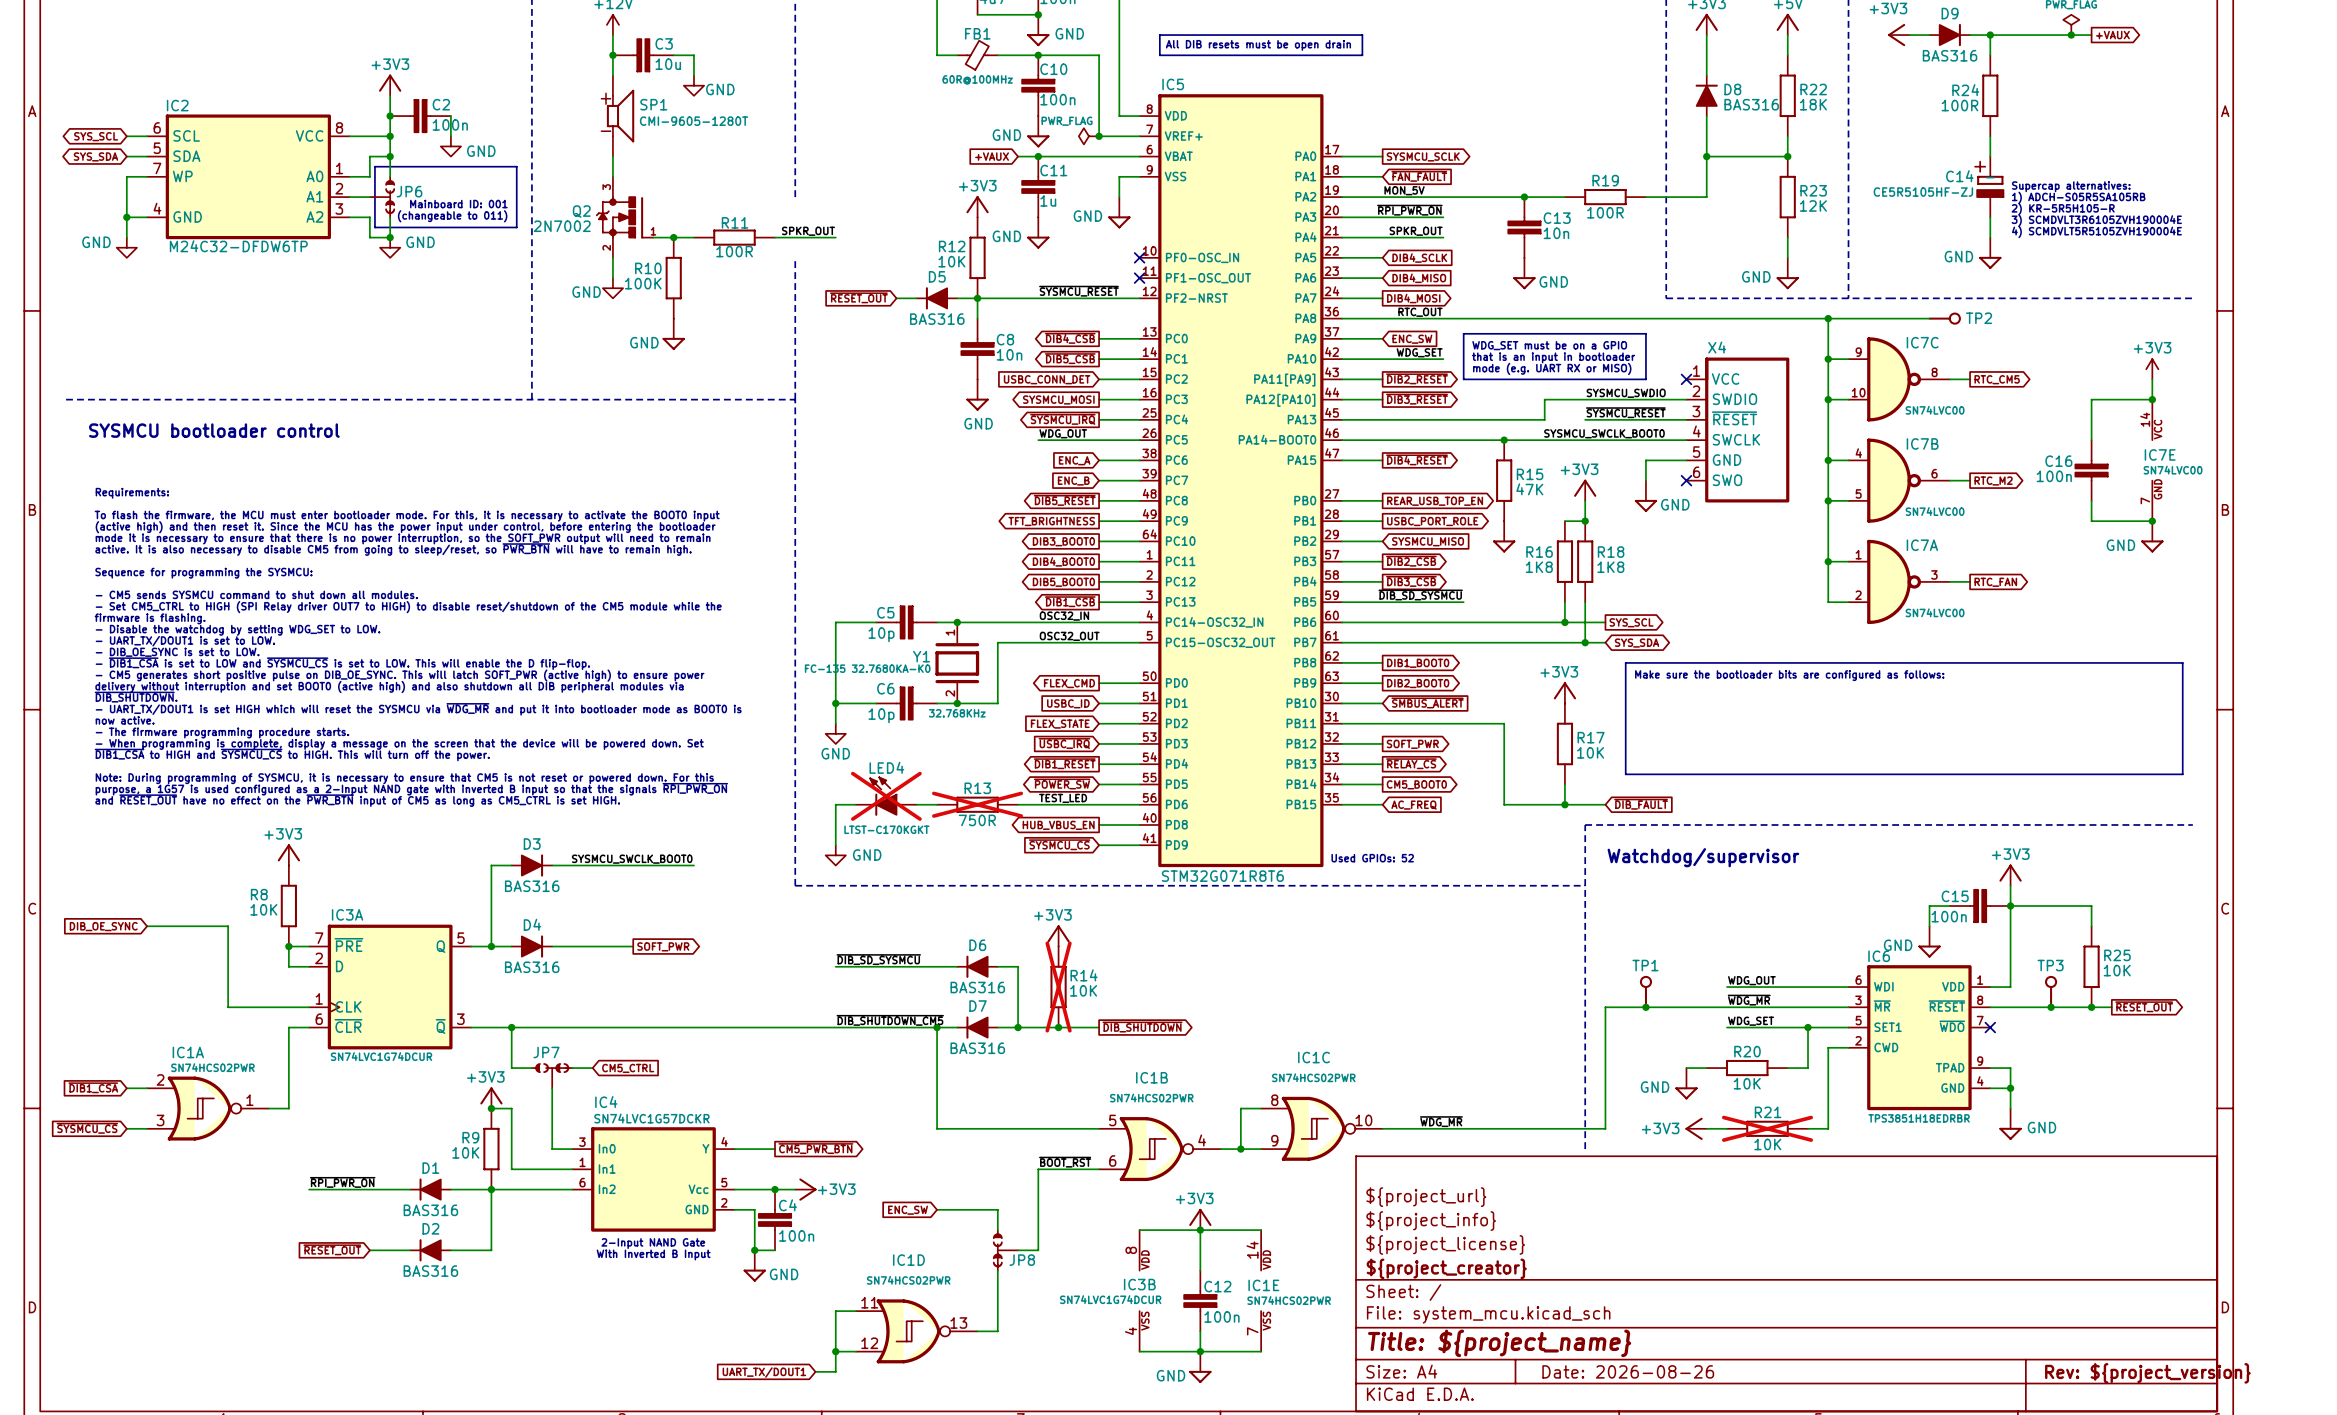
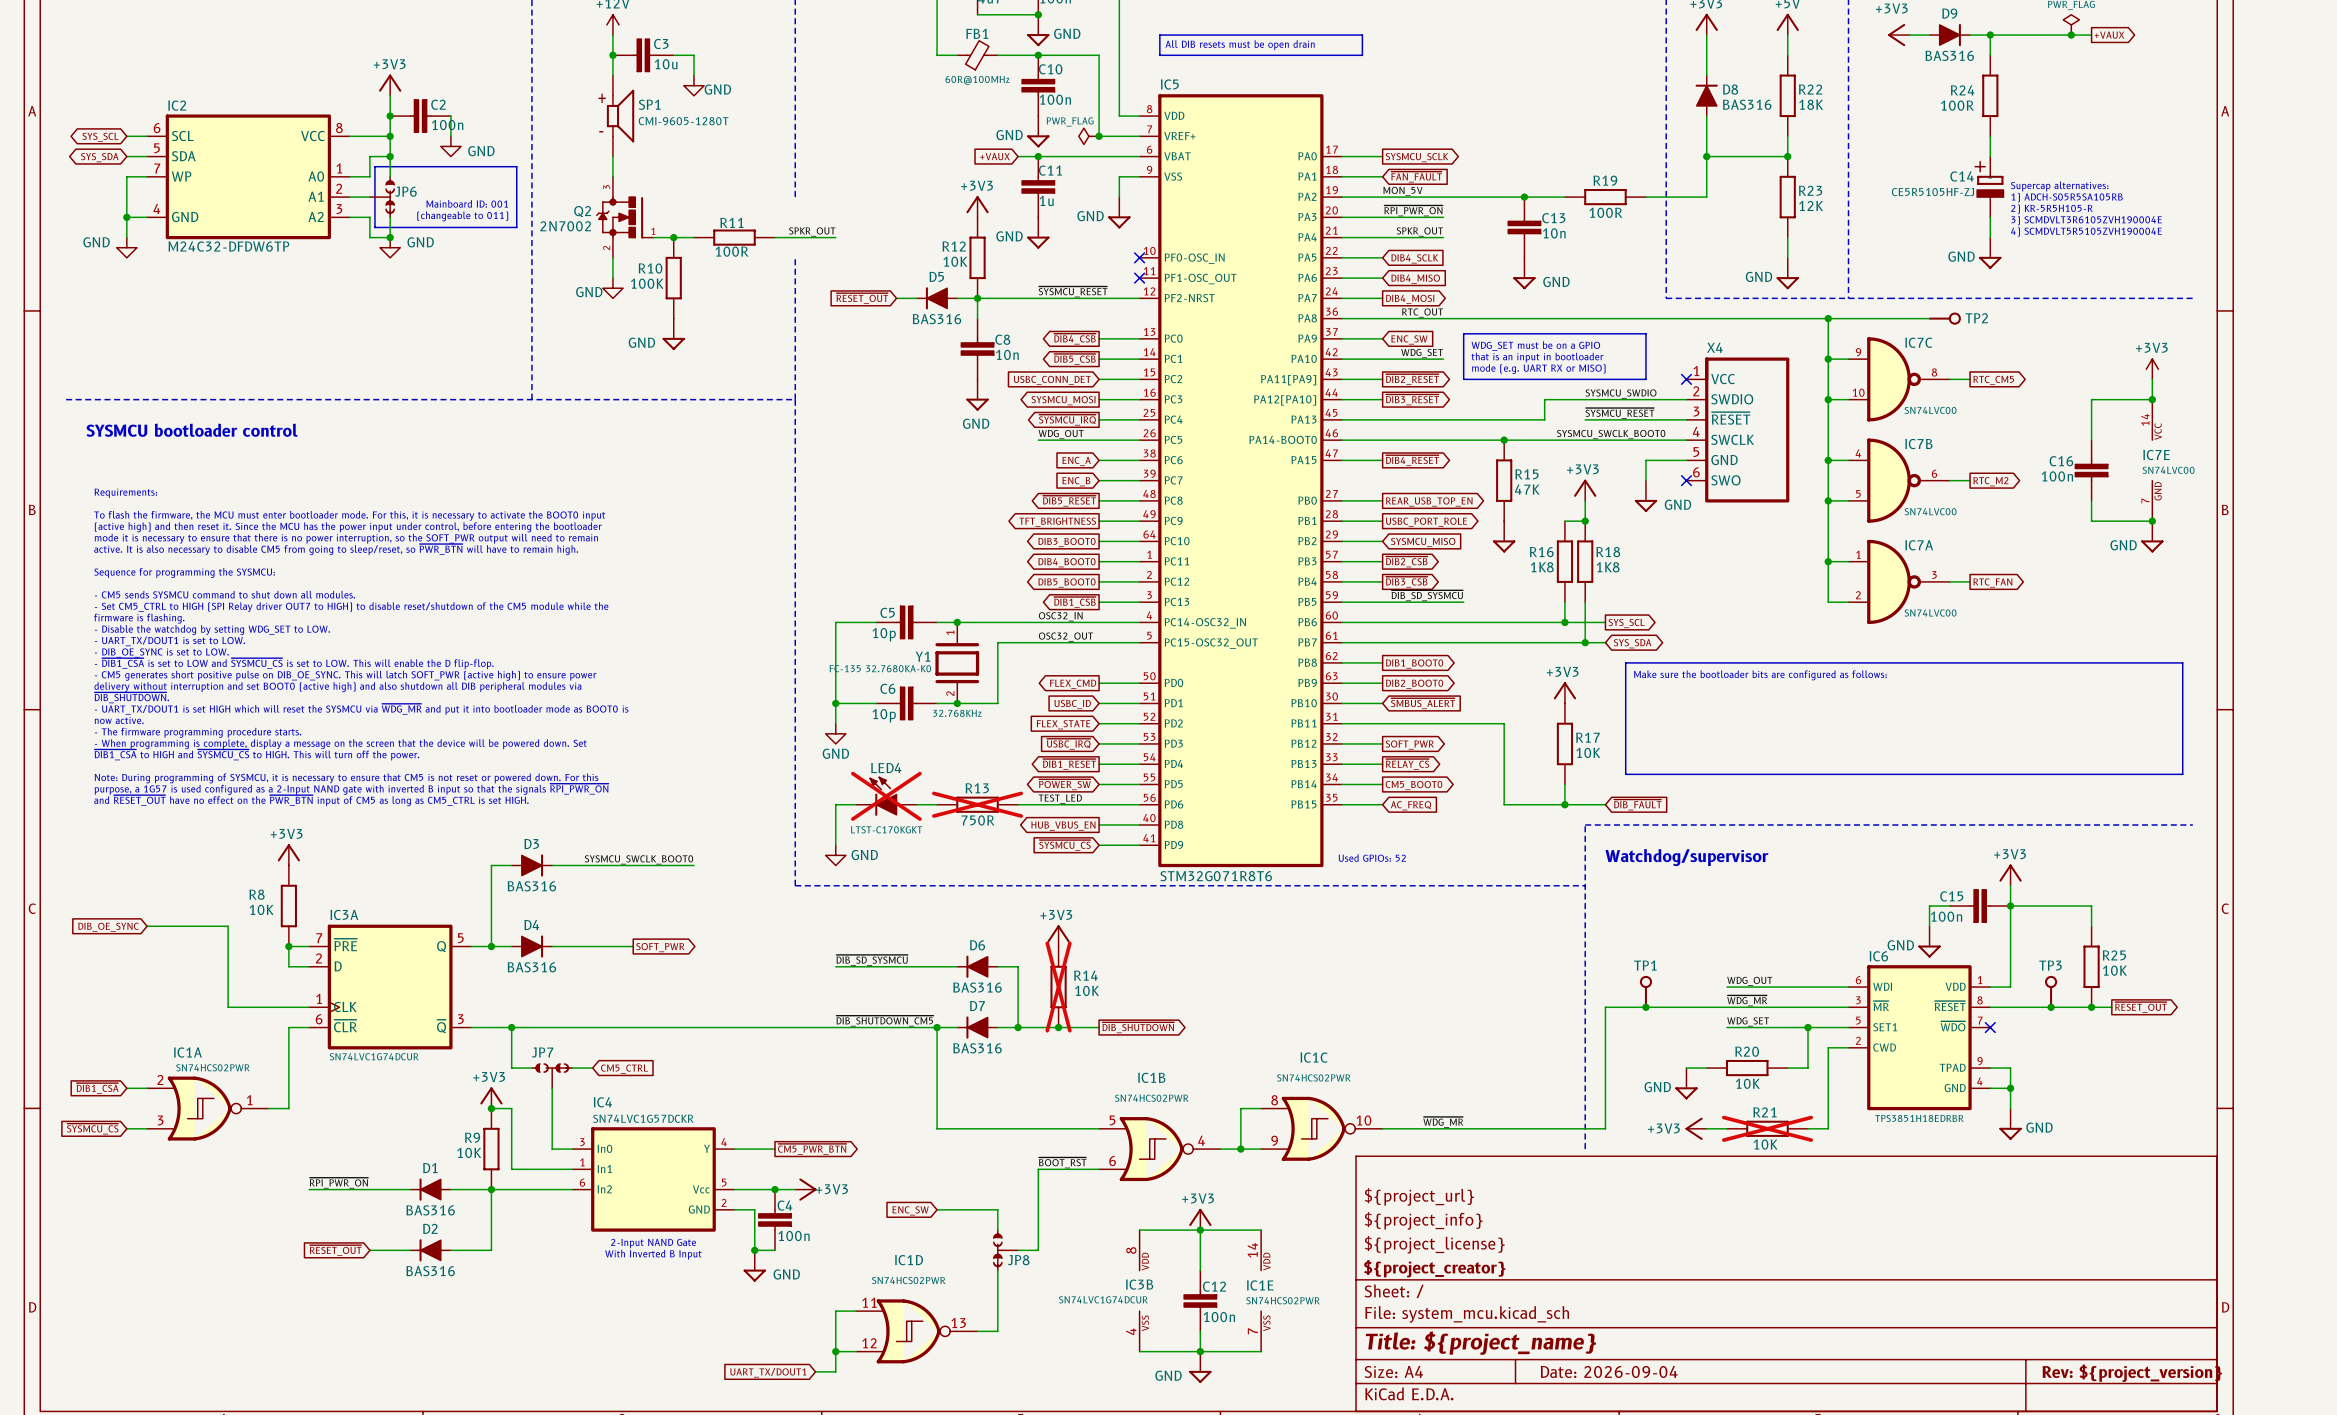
title block: Date: 2026-08-26 (1628, 1371) -> Date: 2026-09-04 (1609, 1371)

